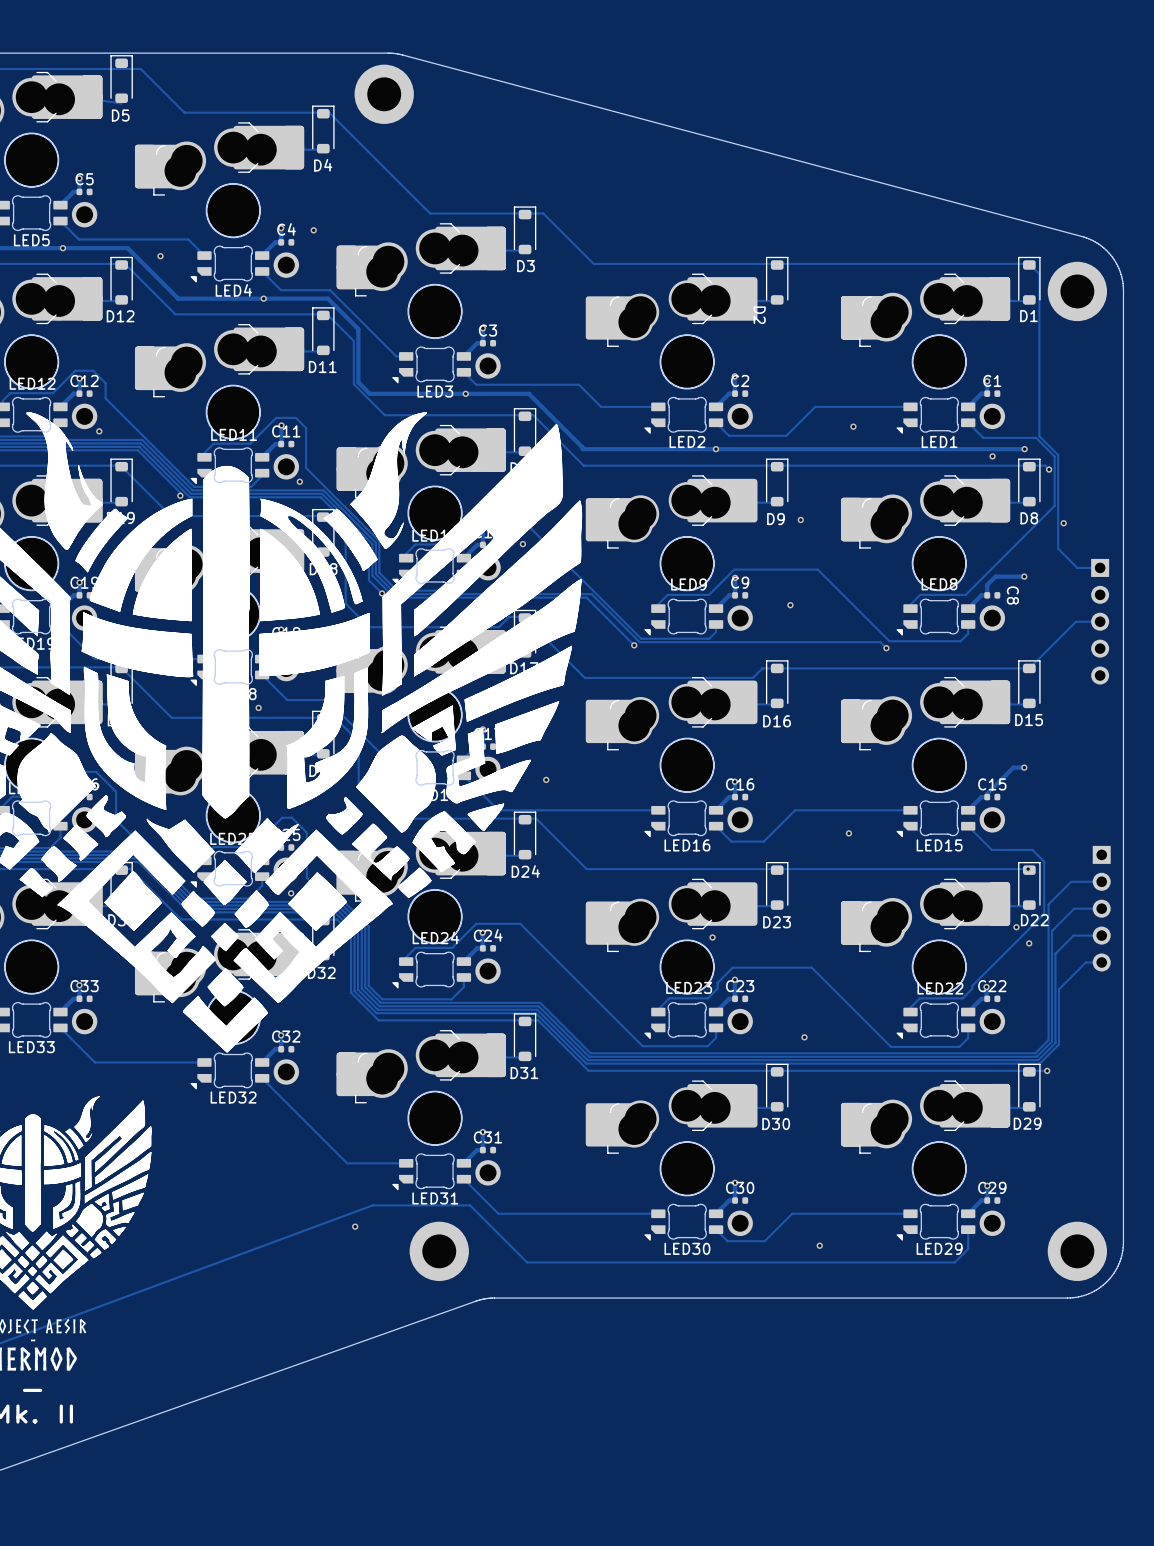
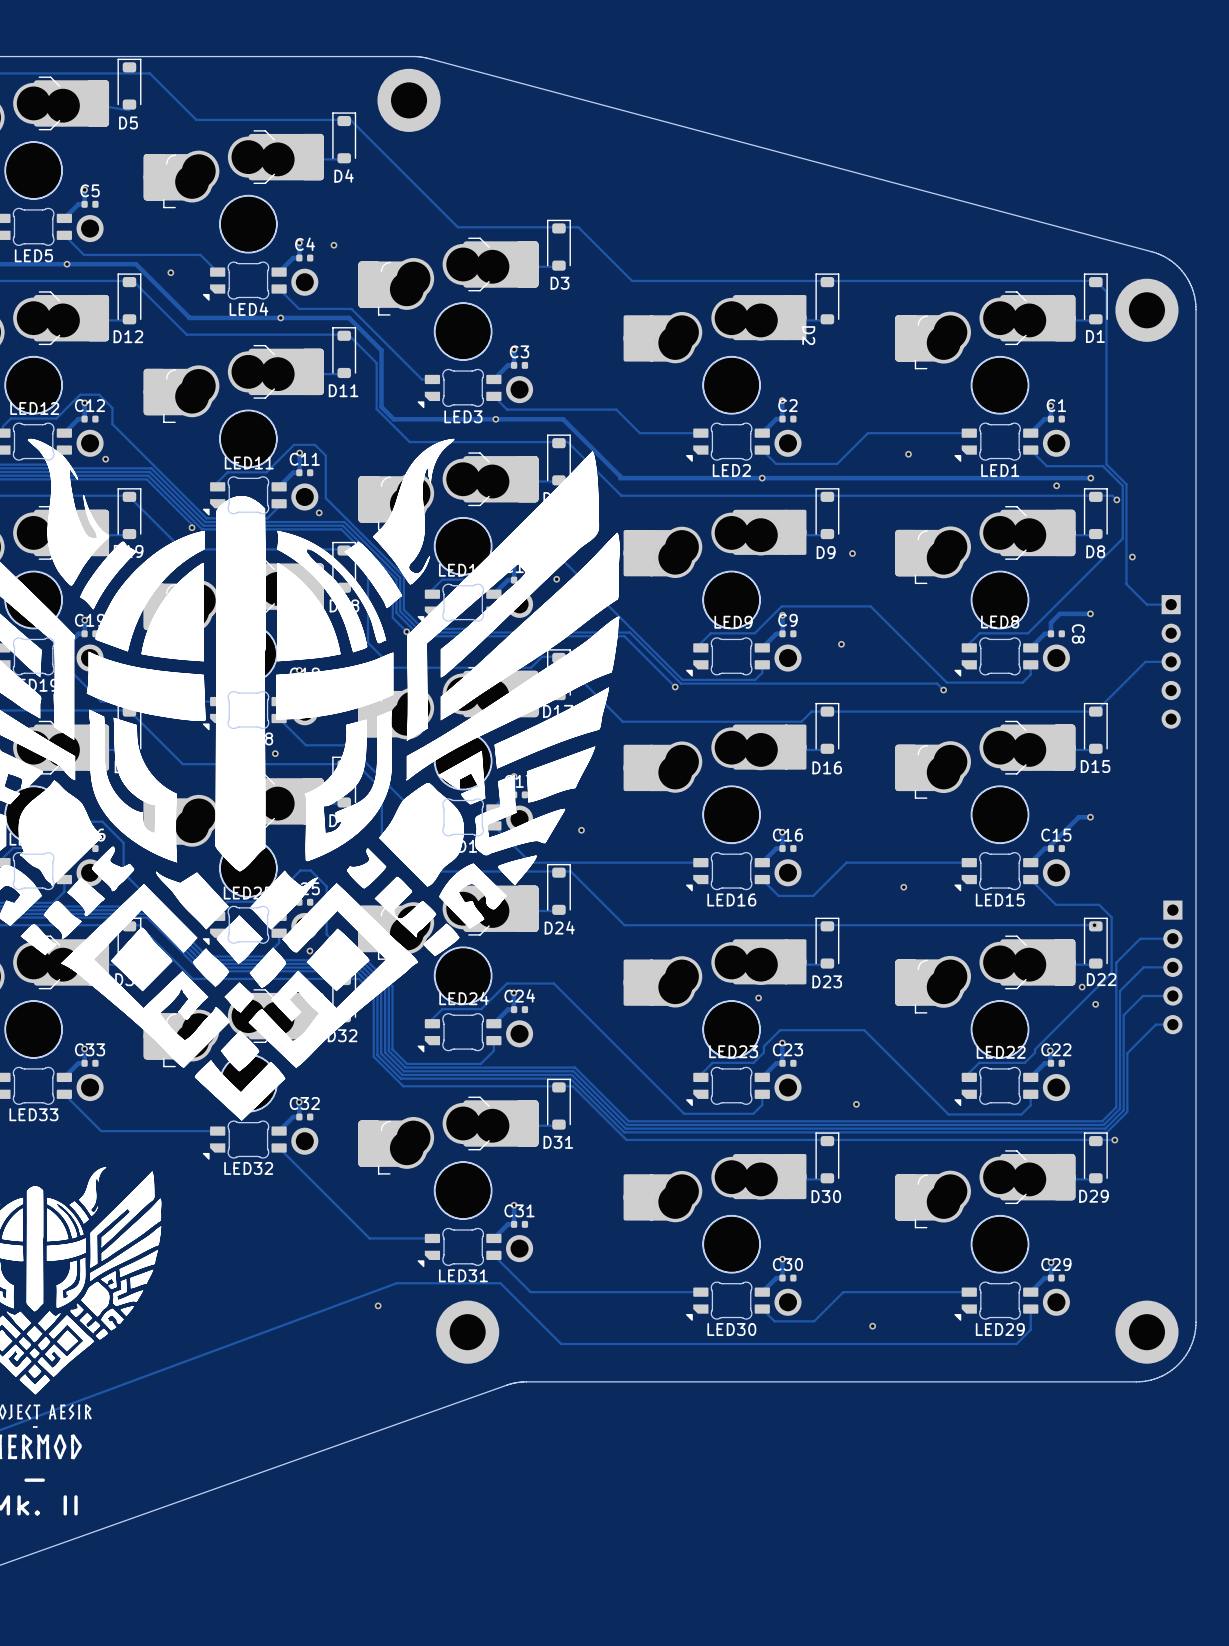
part footprint: [585, 273, 758, 430] -> [623, 295, 807, 457]
part footprint: [585, 475, 758, 631] -> [623, 509, 807, 672]
part footprint: [585, 677, 758, 833] -> [623, 724, 807, 887]
part footprint: [585, 878, 758, 1035] -> [623, 939, 807, 1102]
part footprint: [585, 1080, 758, 1236] -> [623, 1153, 807, 1316]

